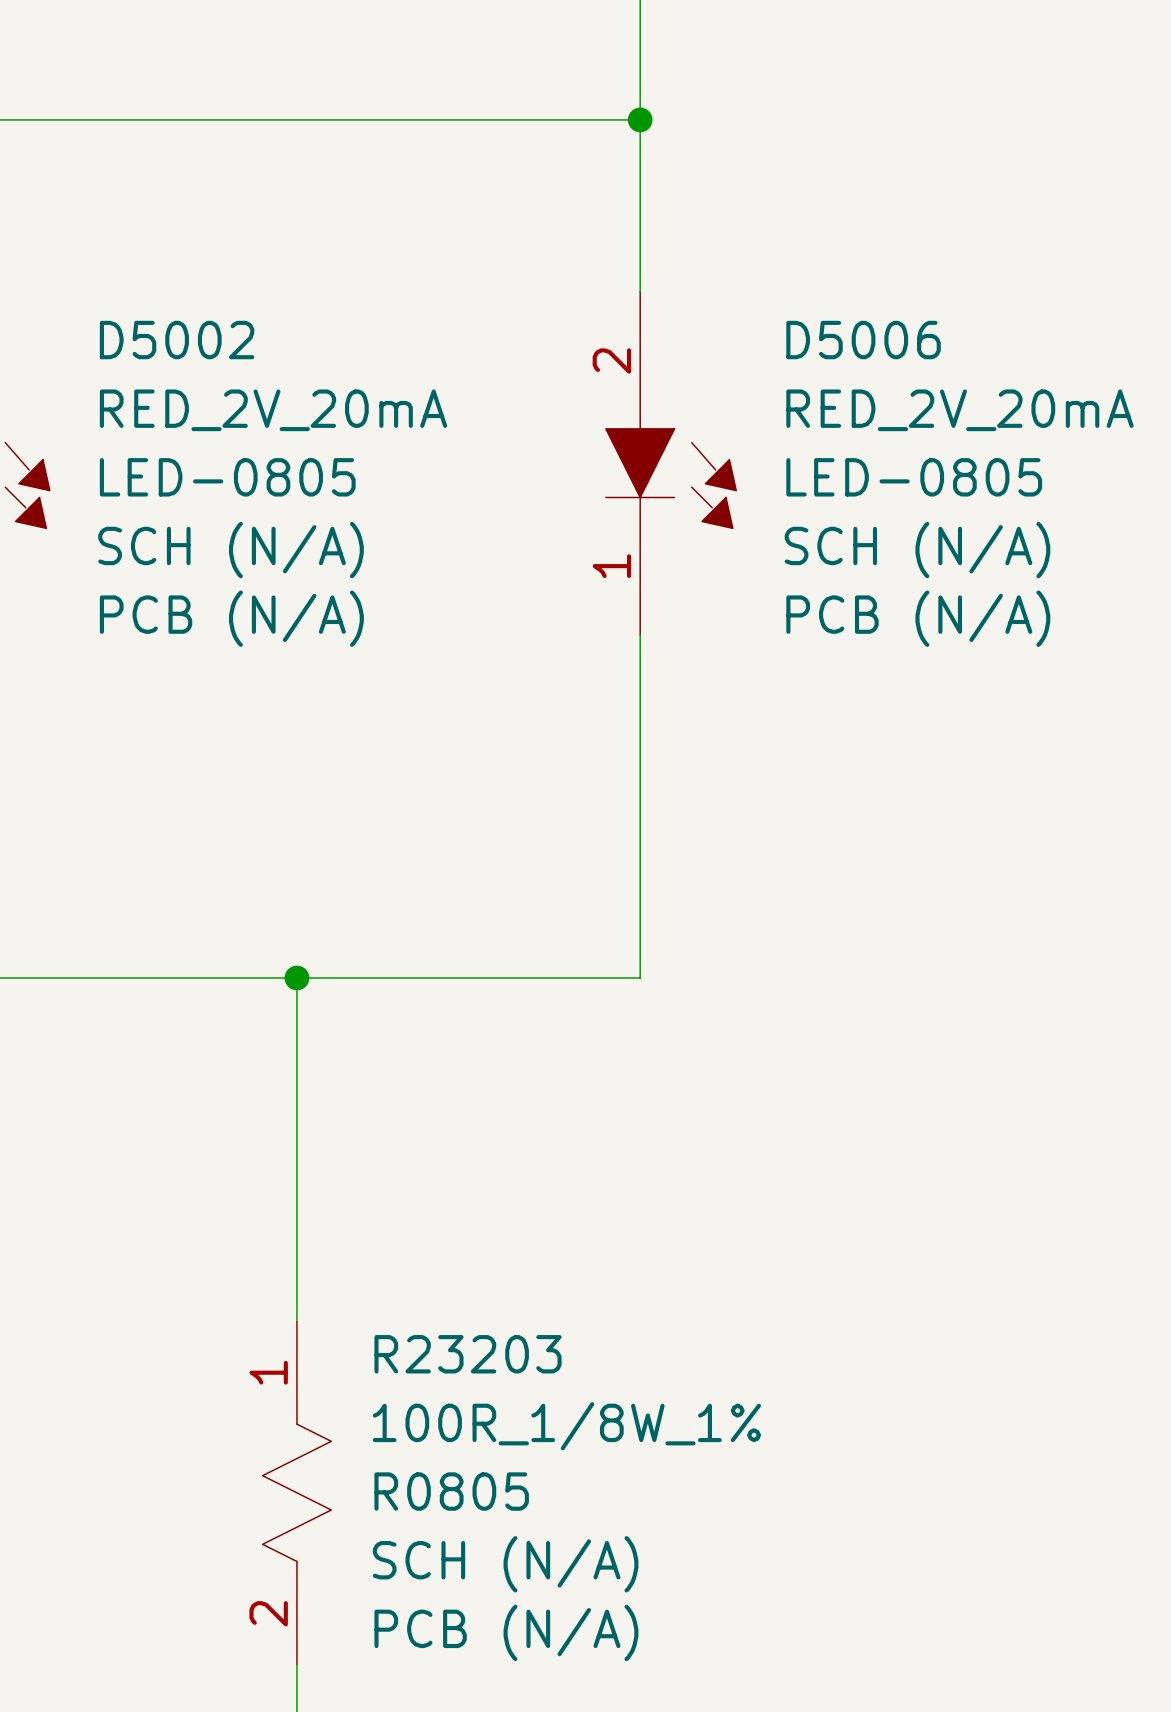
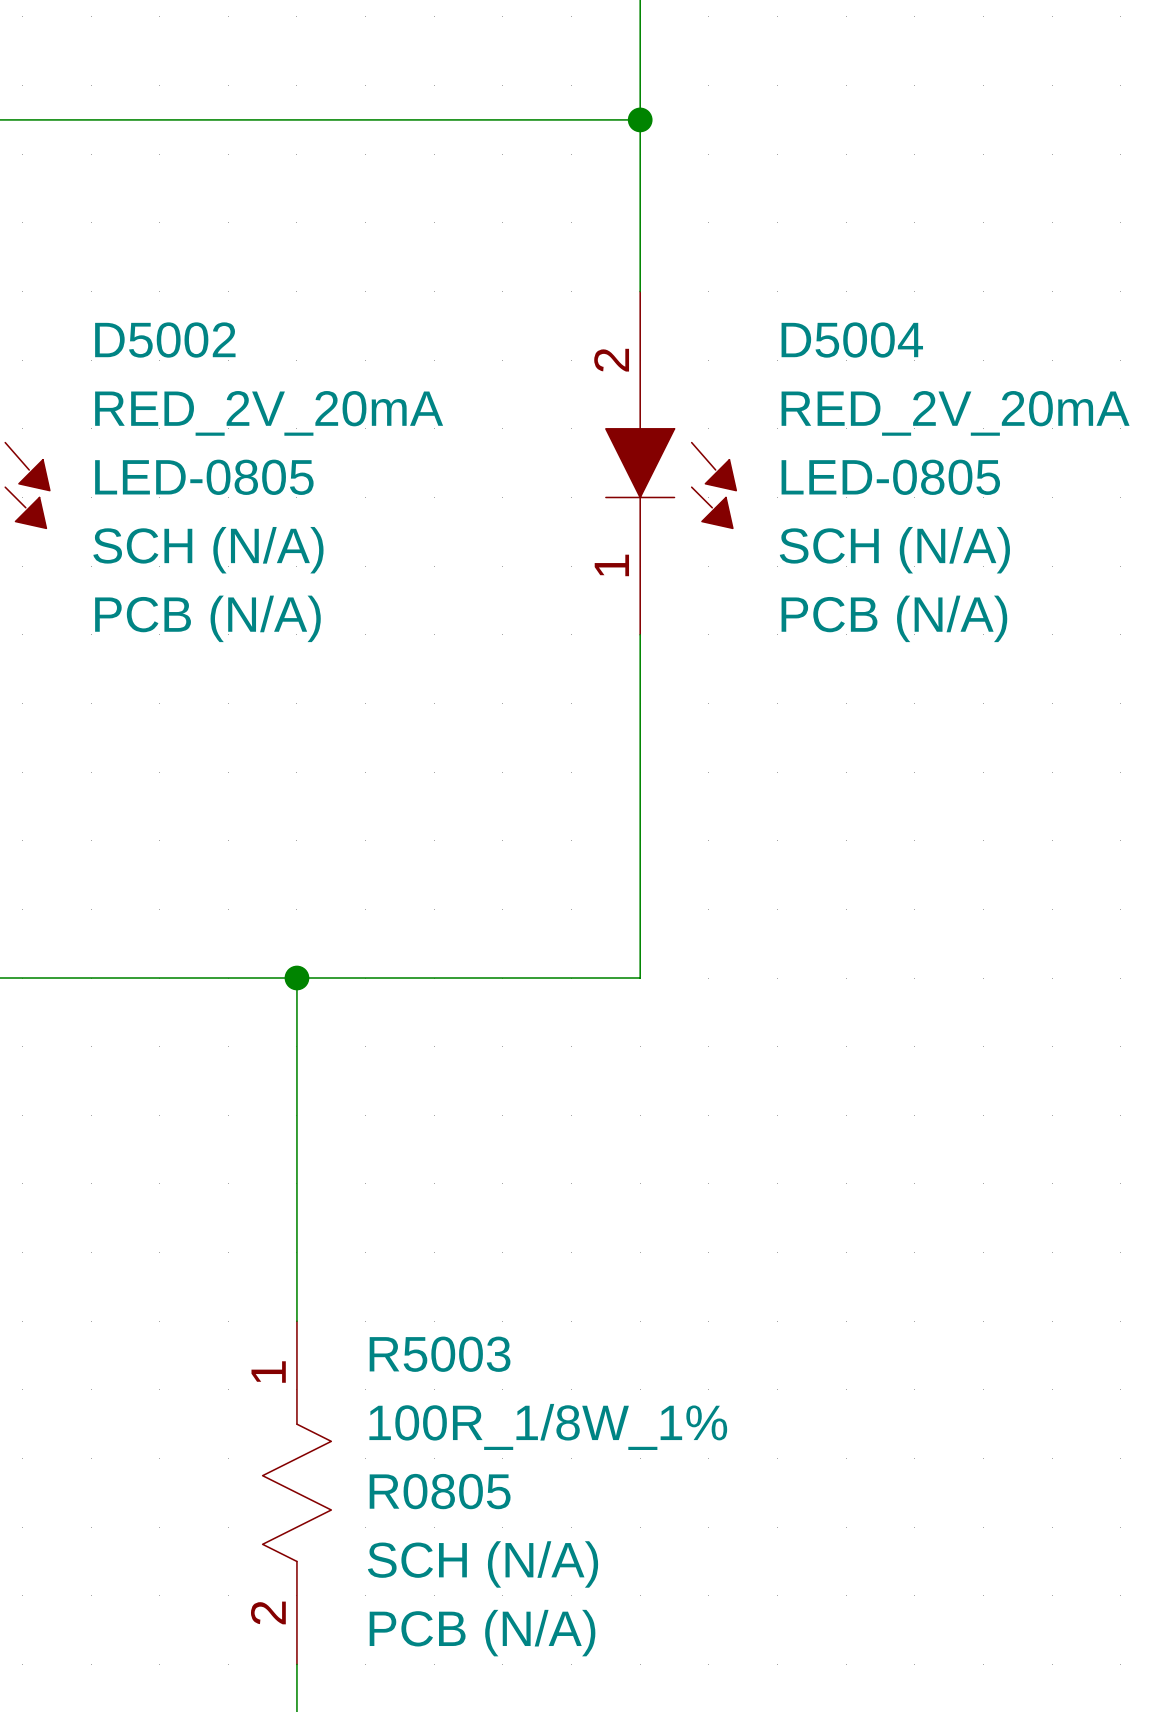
D5006 name: D5006 (863, 340) -> D5004 (852, 340)
R23203 name: R23203 (468, 1354) -> R5003 (440, 1354)

